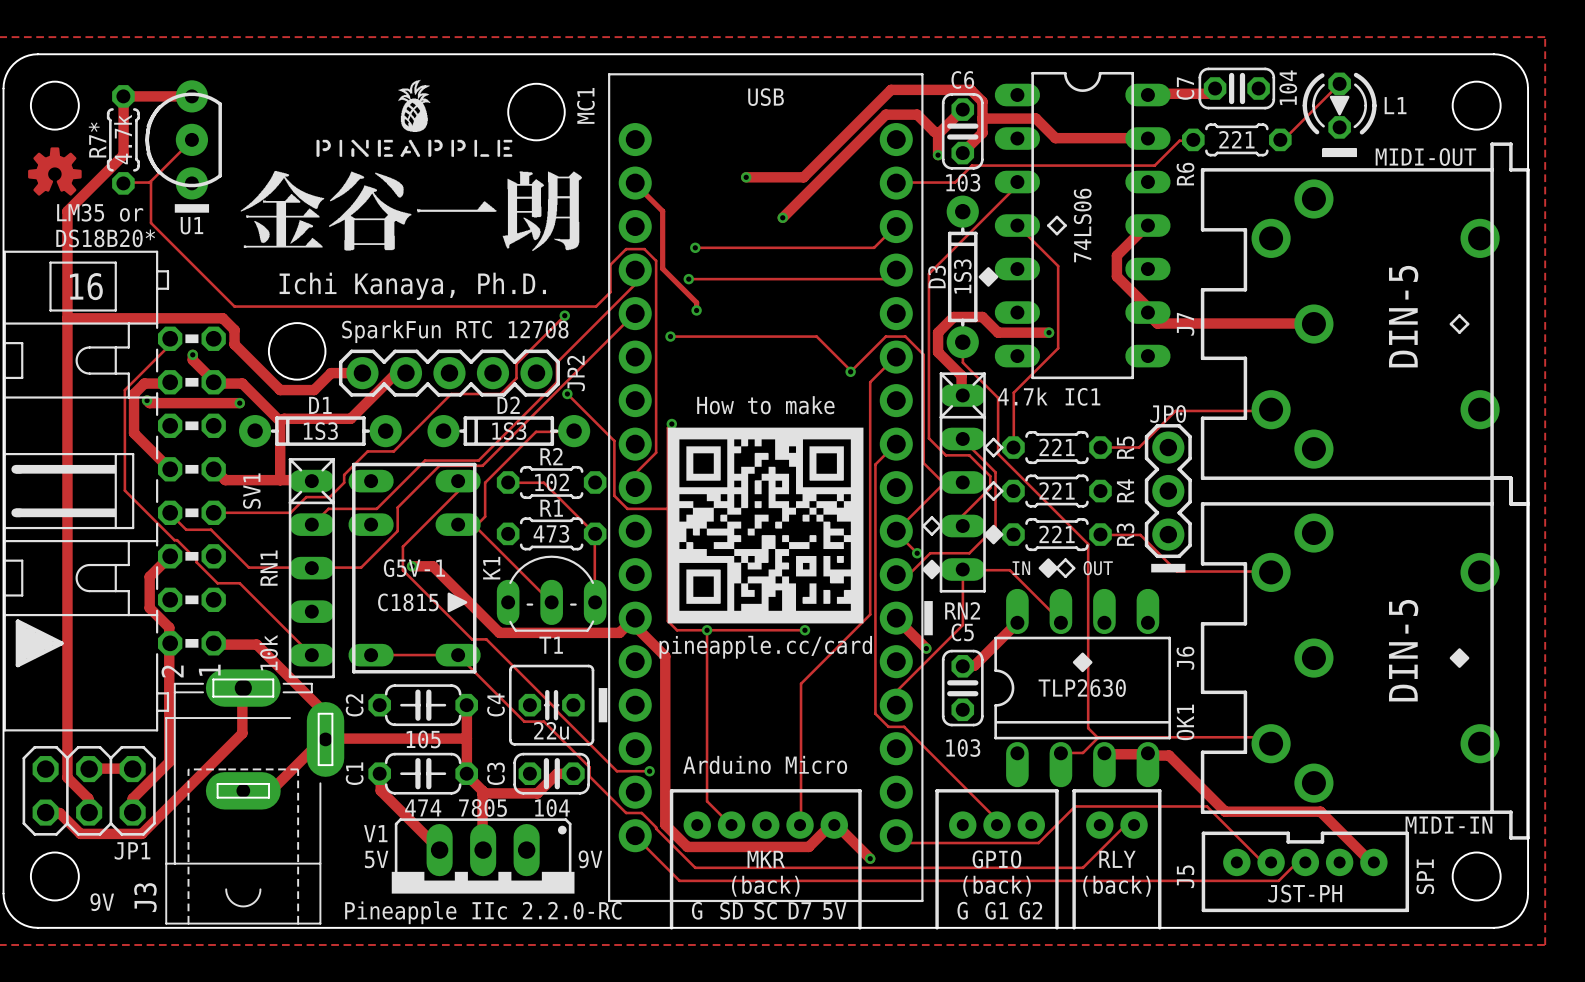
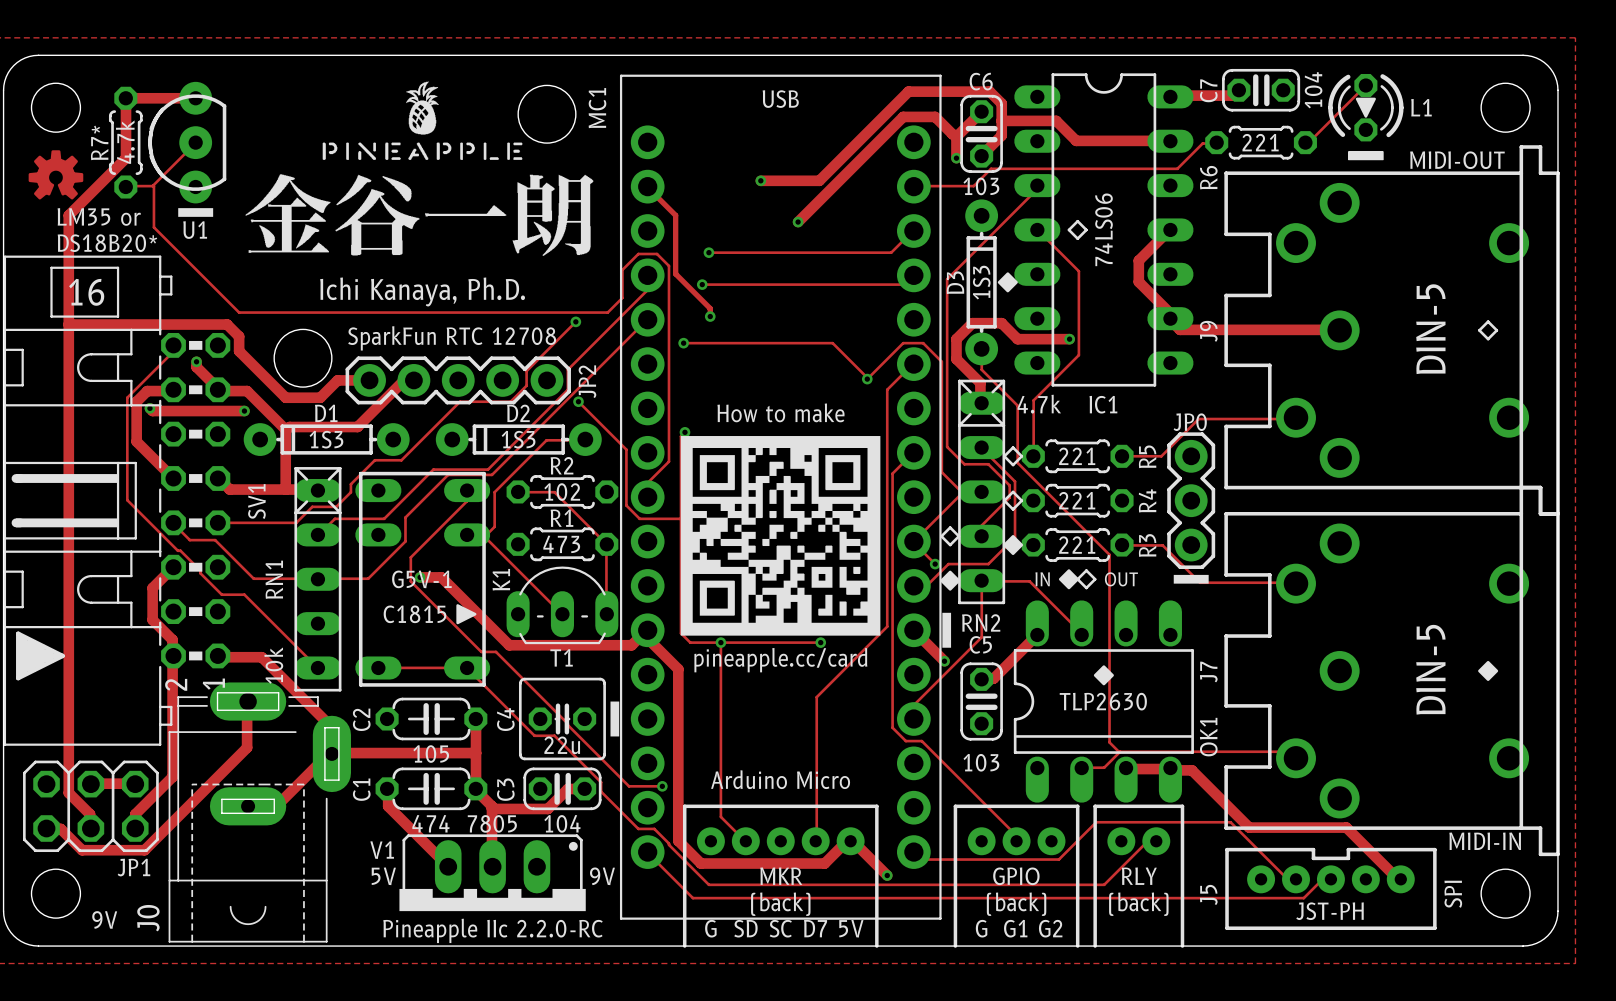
J7 name: J7 (1185, 324) -> J9 (1208, 331)
J6 name: J6 (1185, 658) -> J7 (1208, 672)
J3 name: J3 (145, 897) -> J0 (148, 918)

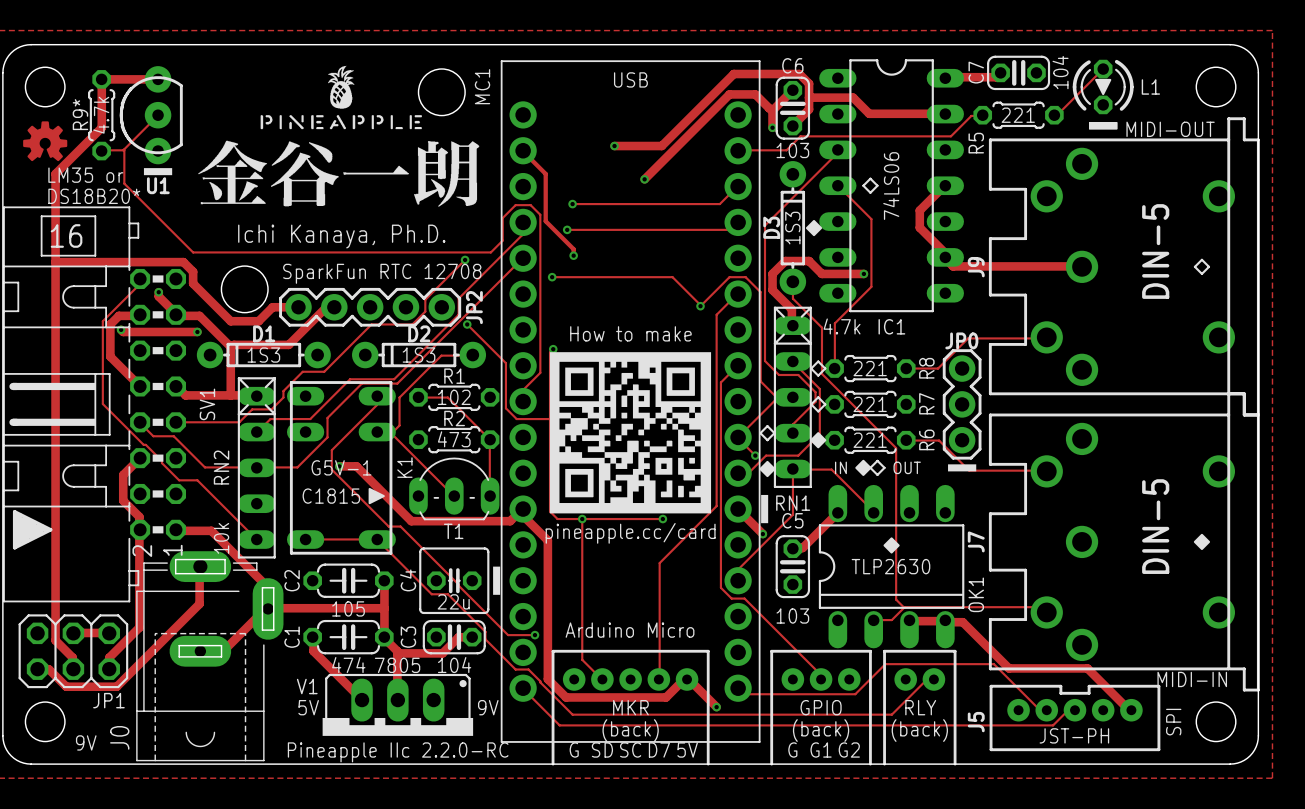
R7* name: R7* (99, 142) -> R9* (80, 114)
R6 name: R6 (1208, 177) -> R5 (976, 143)
R5 name: R5 (1147, 456) -> R8 (926, 368)
R2 name: R2 (562, 465) -> R1 (454, 376)
R4 name: R4 (1147, 500) -> R7 (926, 403)
R1 name: R1 (561, 518) -> R2 (454, 418)
R3 name: R3 (1147, 545) -> R6 (926, 439)
RN1 name: RN1 (274, 579) -> RN2 (221, 467)
RN2 name: RN2 (981, 622) -> RN1 (793, 503)

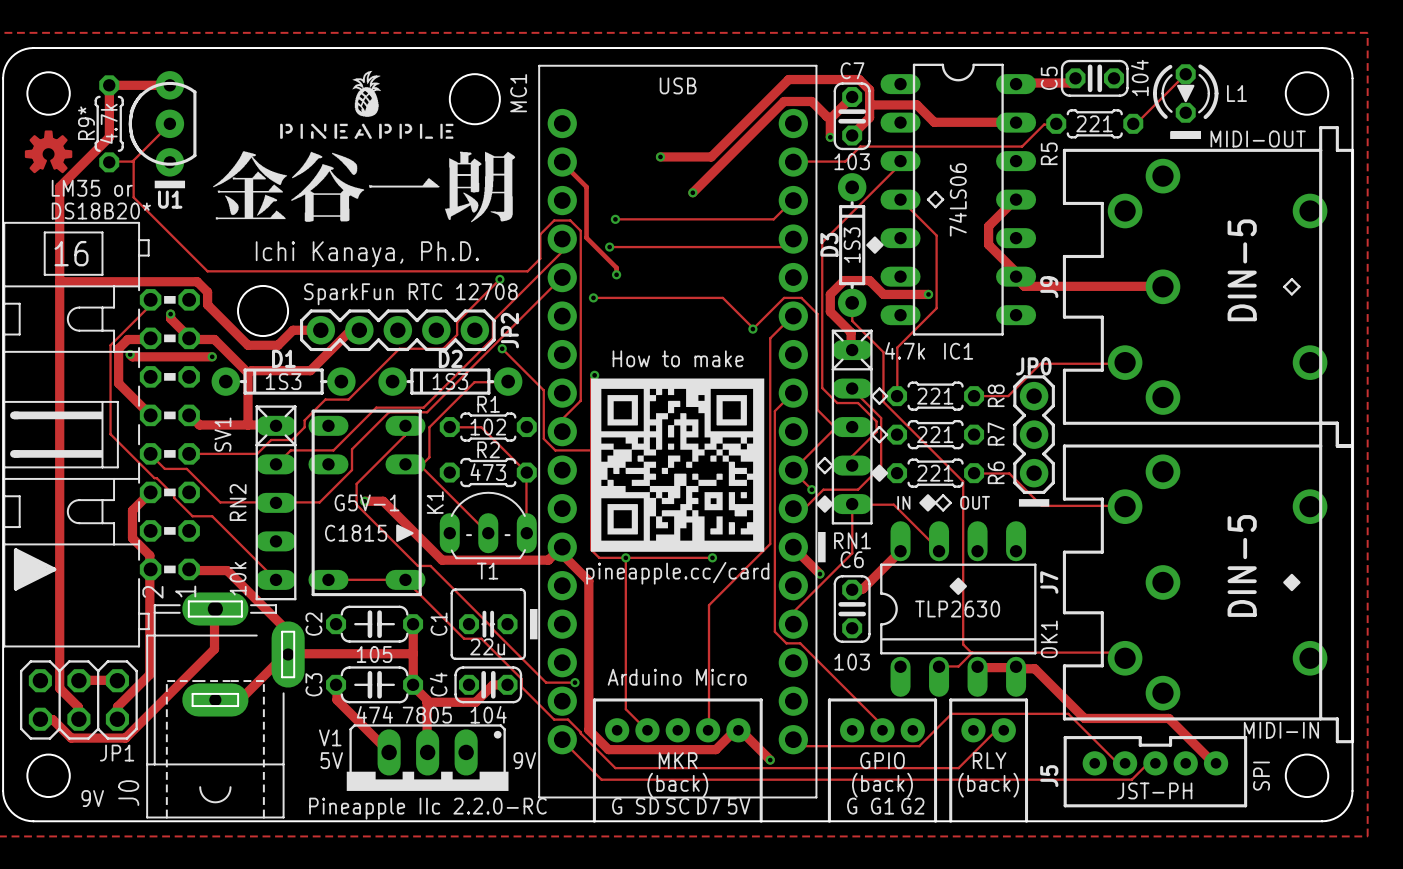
C6 name: C6 (792, 65) -> C7 (852, 70)
C7 name: C7 (976, 72) -> C5 (1049, 78)
C5 name: C5 (792, 520) -> C6 (852, 559)
C4 name: C4 (408, 580) -> C1 (439, 624)
C1 name: C1 (292, 637) -> C3 (313, 684)
C3 name: C3 (408, 637) -> C4 (438, 684)

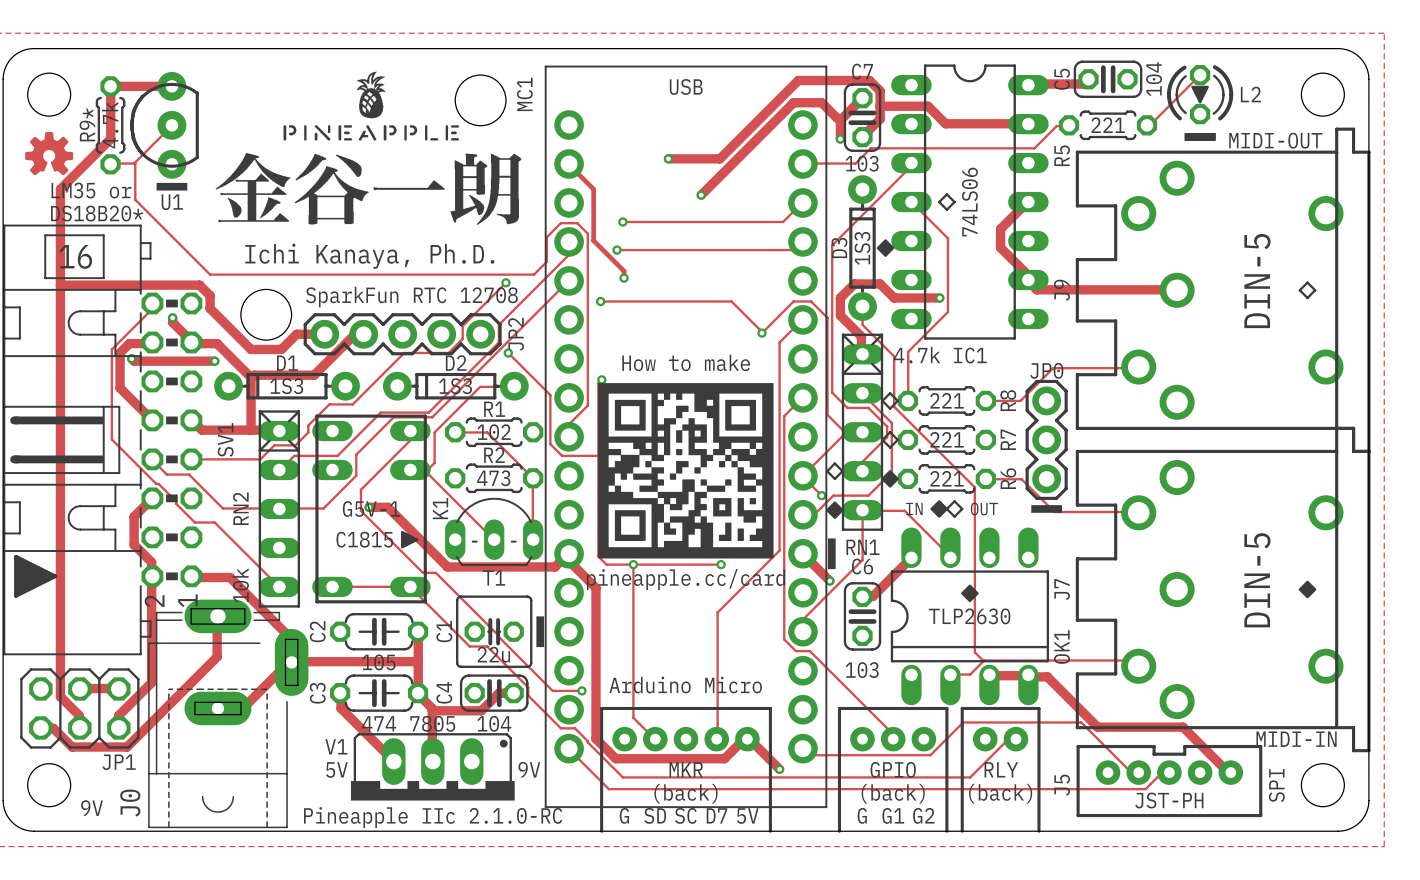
L1 name: L1 (1236, 93) -> L2 (1250, 94)
text: Pineapple IIc 2.2.0-RC (427, 808) -> Pineapple IIc 2.1.0-RC (433, 817)

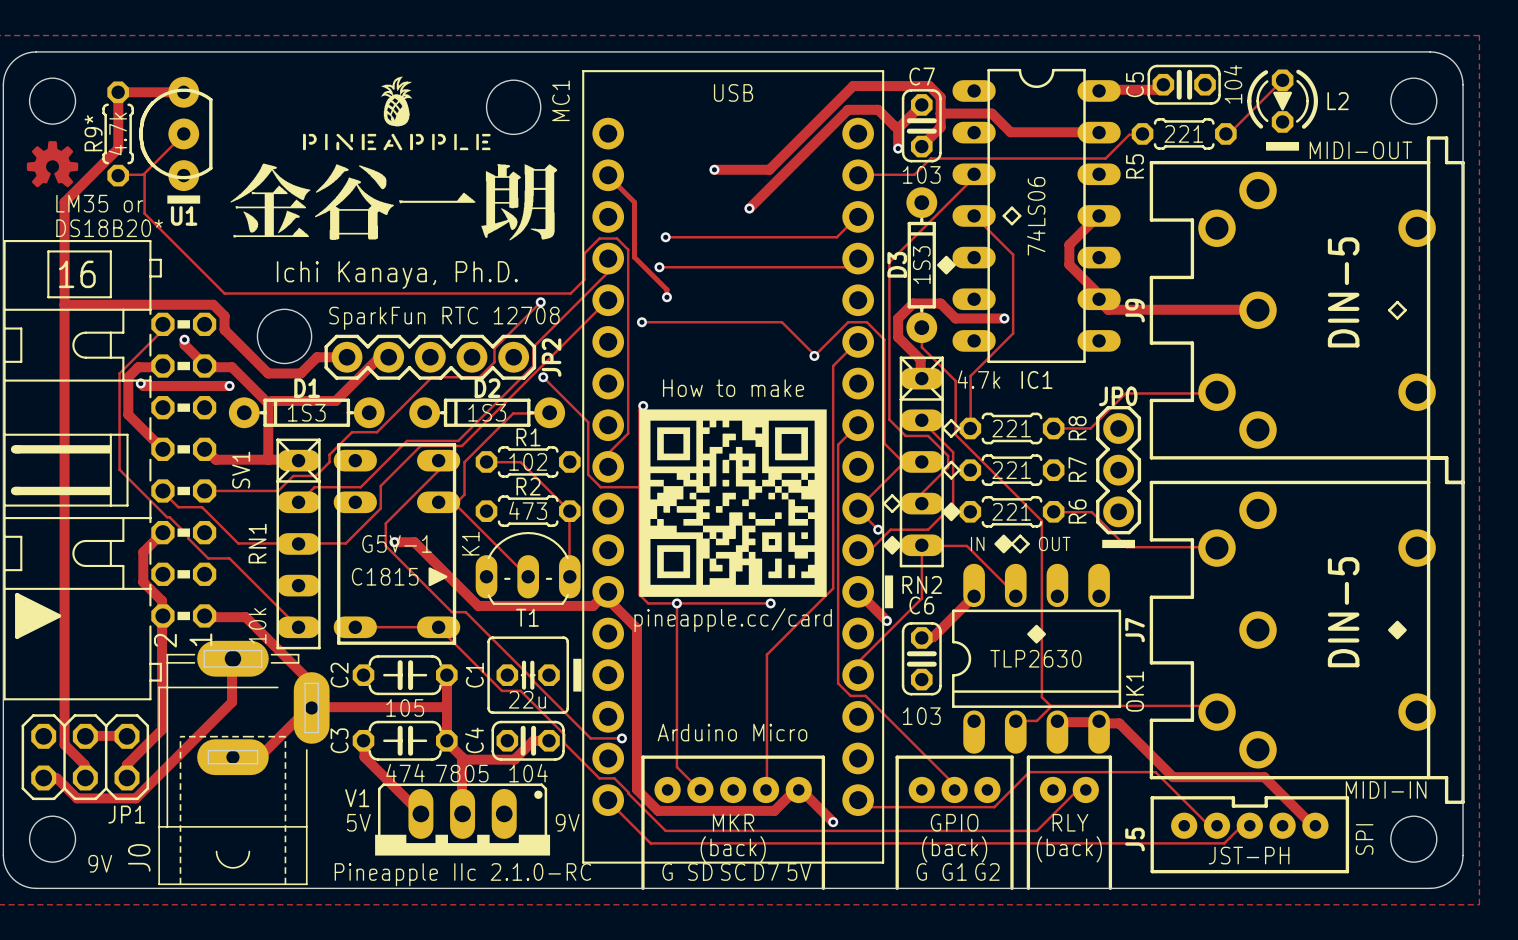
RN2 name: RN2 (240, 508) -> RN1 (257, 543)
RN1 name: RN1 (862, 547) -> RN2 (922, 584)

